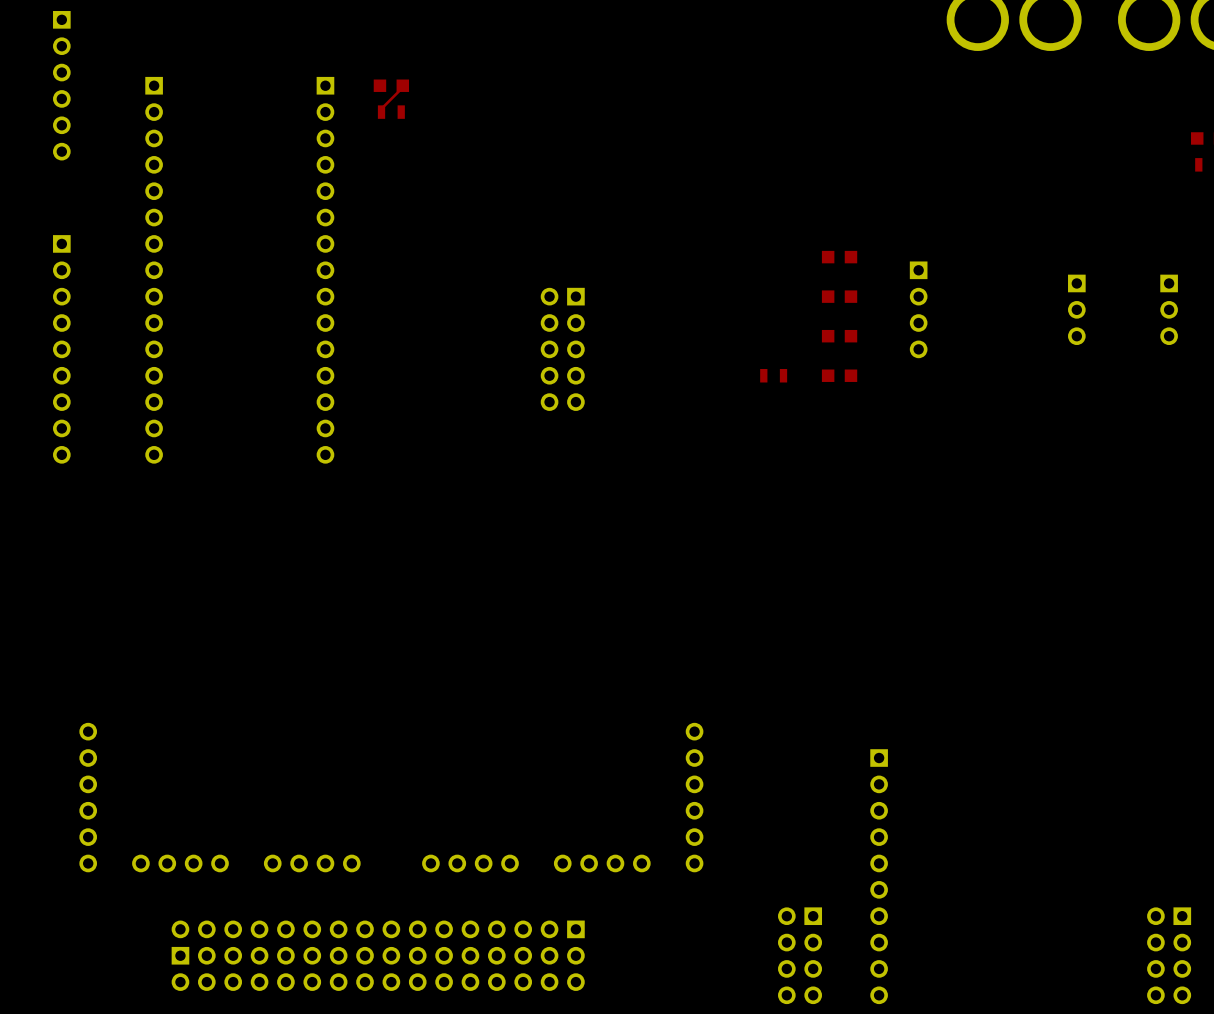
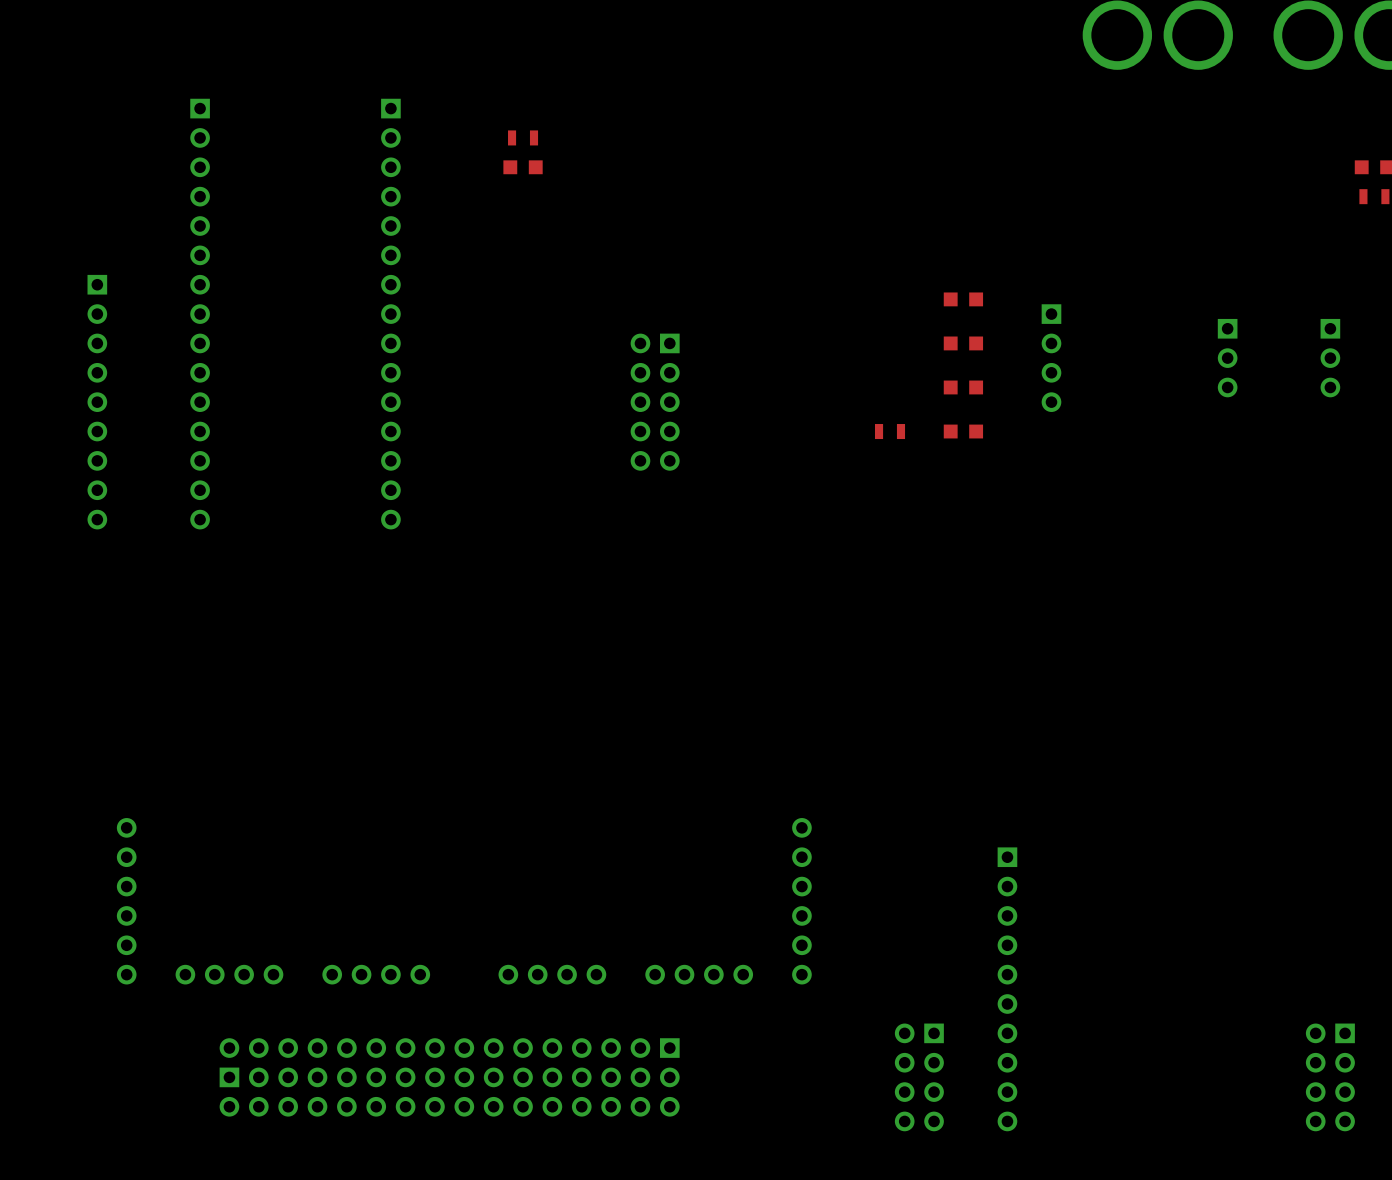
part: (61, 85) -> none
part position: (391, 85) -> (523, 167)
top track: (402, 85) (381, 108) (381, 112) -> none
part position: (391, 112) -> (523, 137)

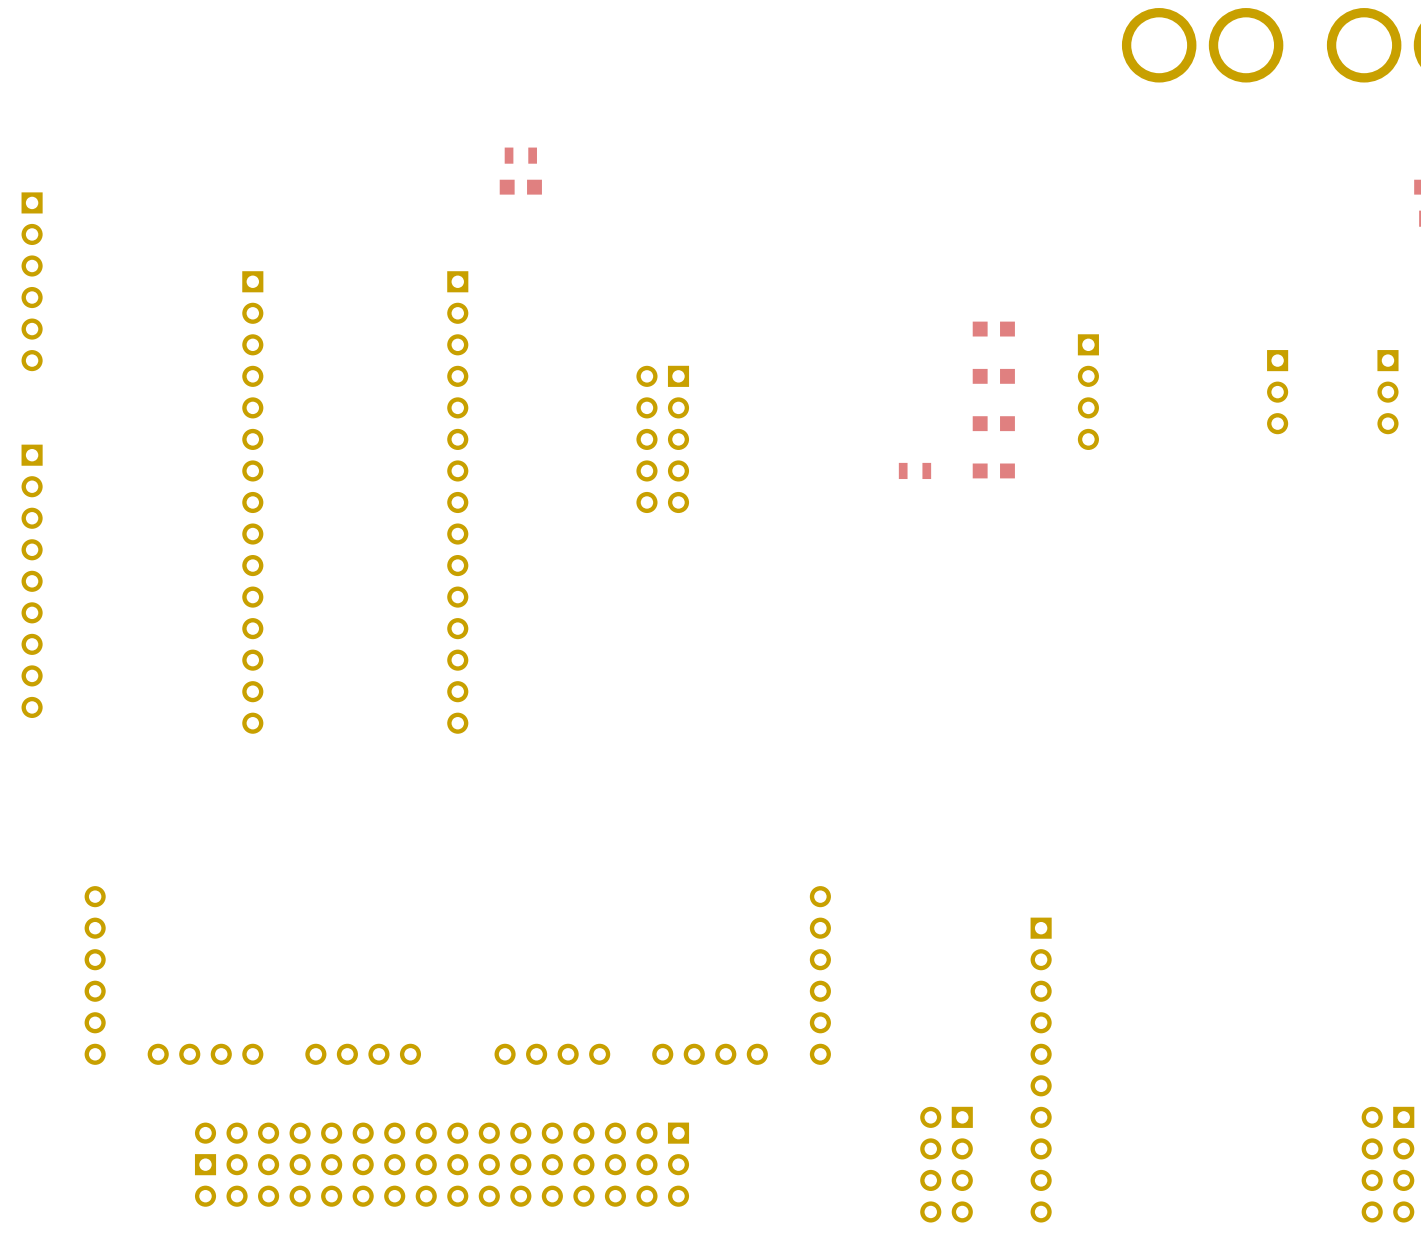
part: none -> (32, 281)
part: (200, 314) -> none
part: (390, 314) -> none
part position: (97, 402) -> (32, 581)
part: none -> (252, 502)
part: none -> (457, 502)

